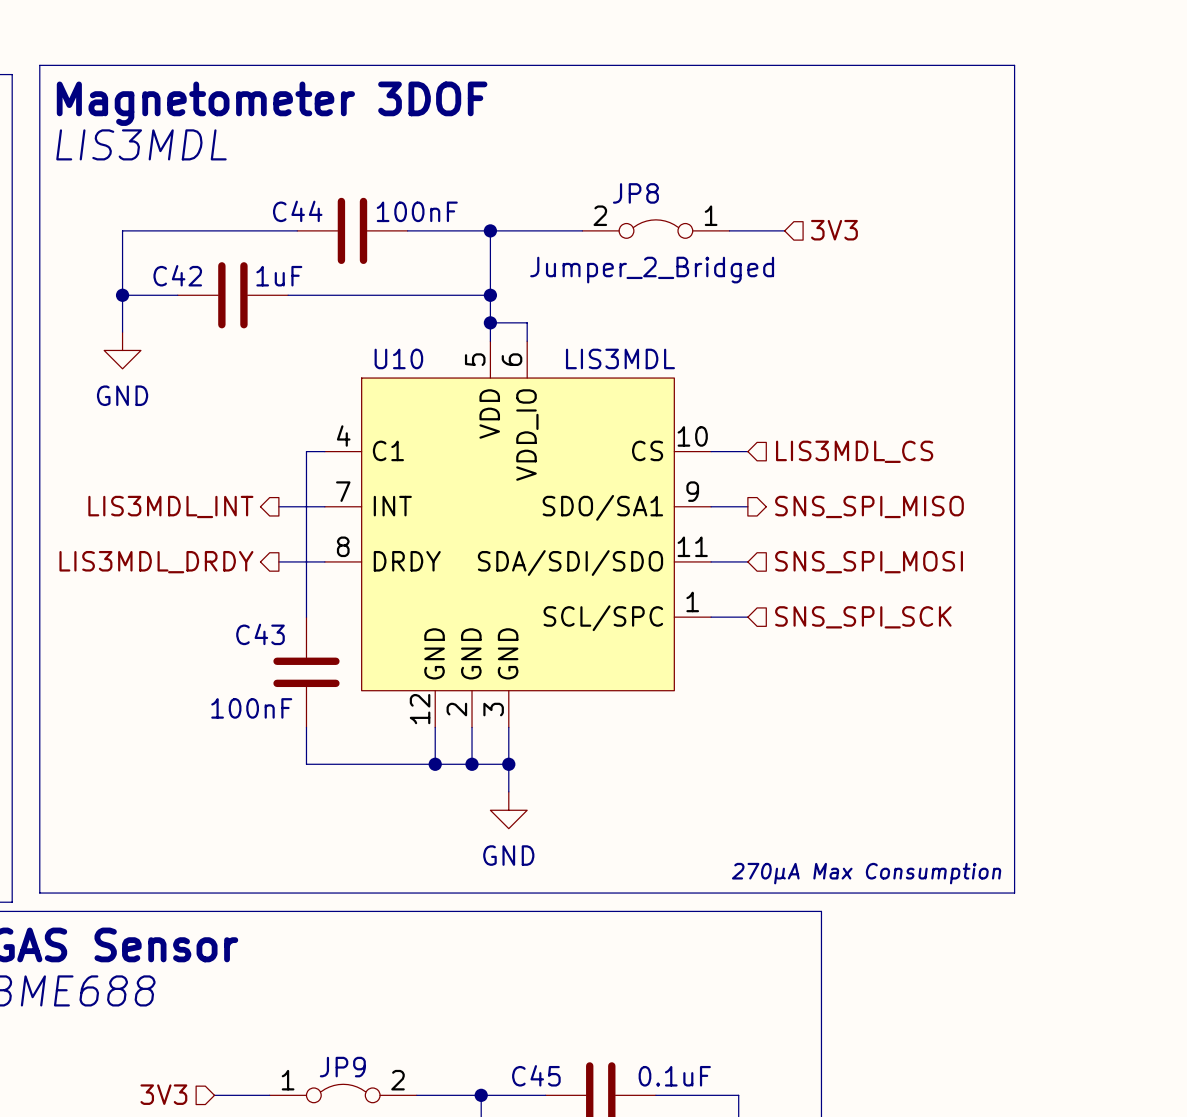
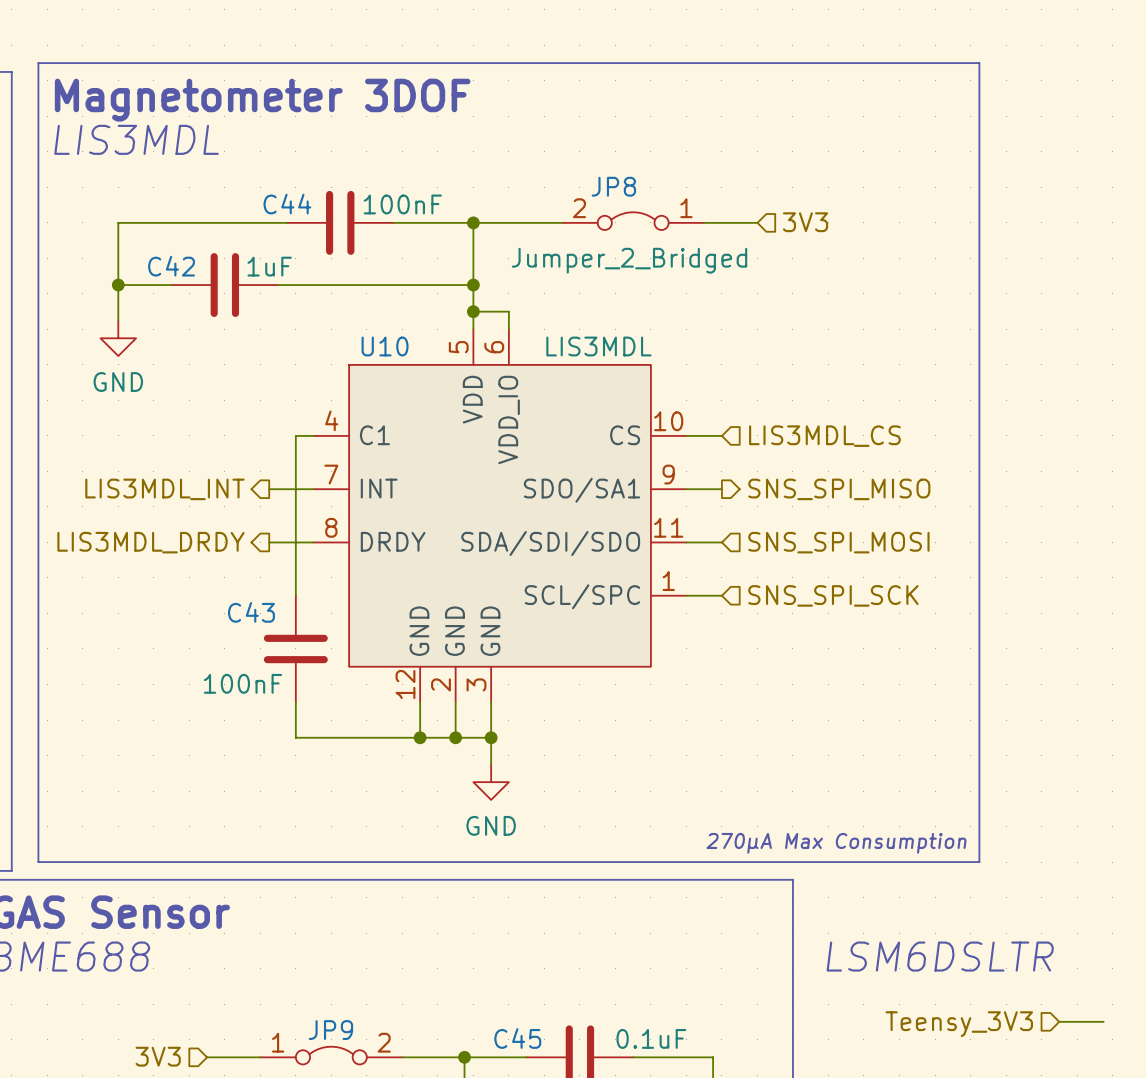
text: none -> LSM6DSLTR (940, 956)
wire: none -> (1059, 1021) (1103, 1021)
hierarchical label: none -> Teensy_3V3 (959, 1024)

